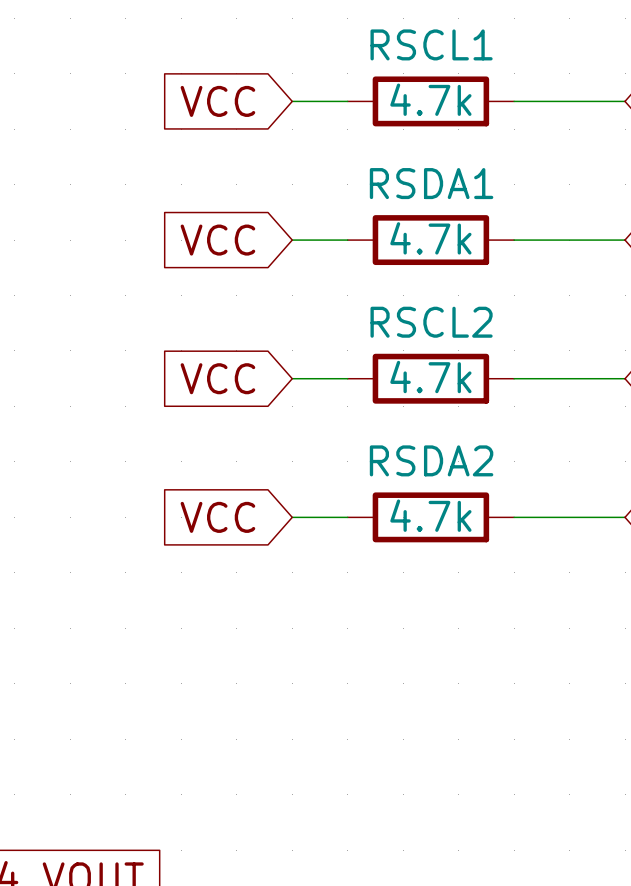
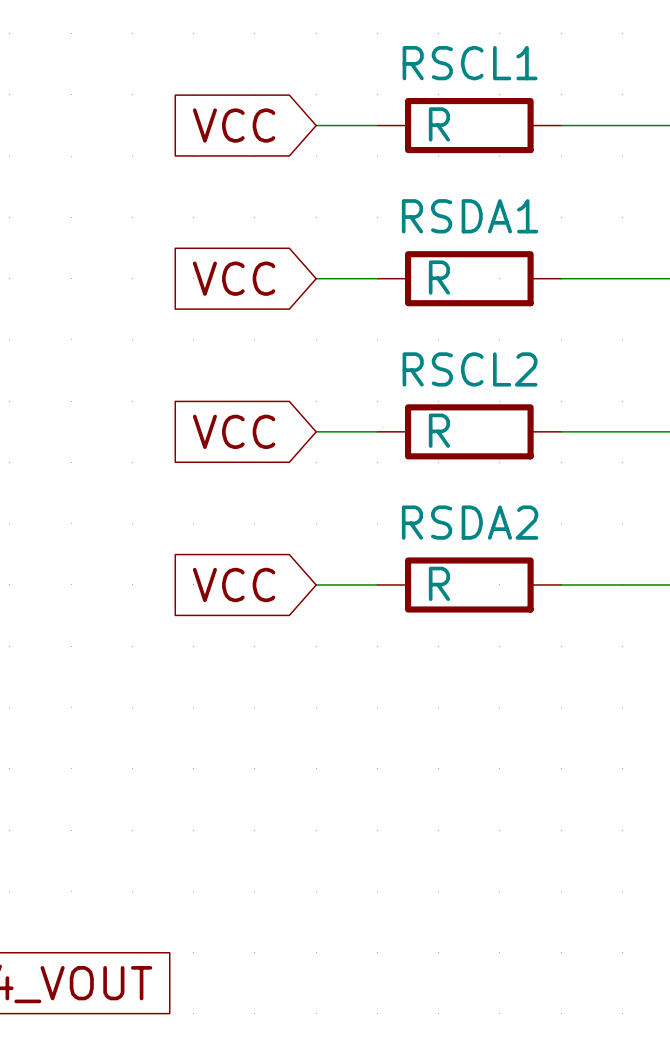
RSCL1 value: 4.7k (430, 99) -> R (439, 124)
RSDA1 value: 4.7k (430, 238) -> R (439, 277)
RSCL2 value: 4.7k (430, 377) -> R (439, 430)
RSDA2 value: 4.7k (430, 515) -> R (439, 583)

